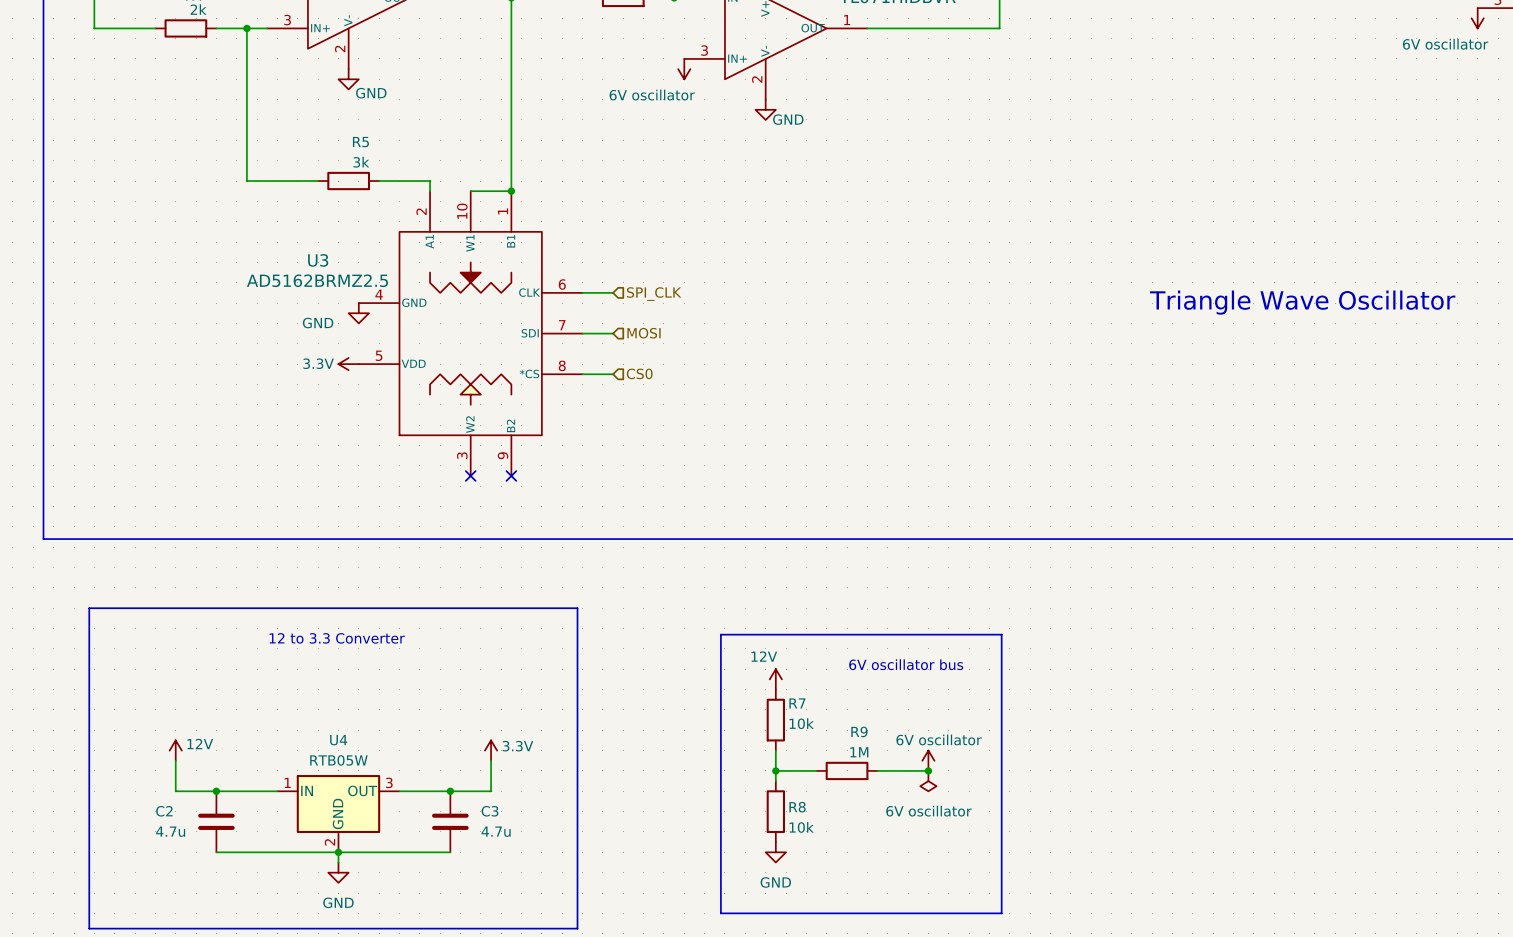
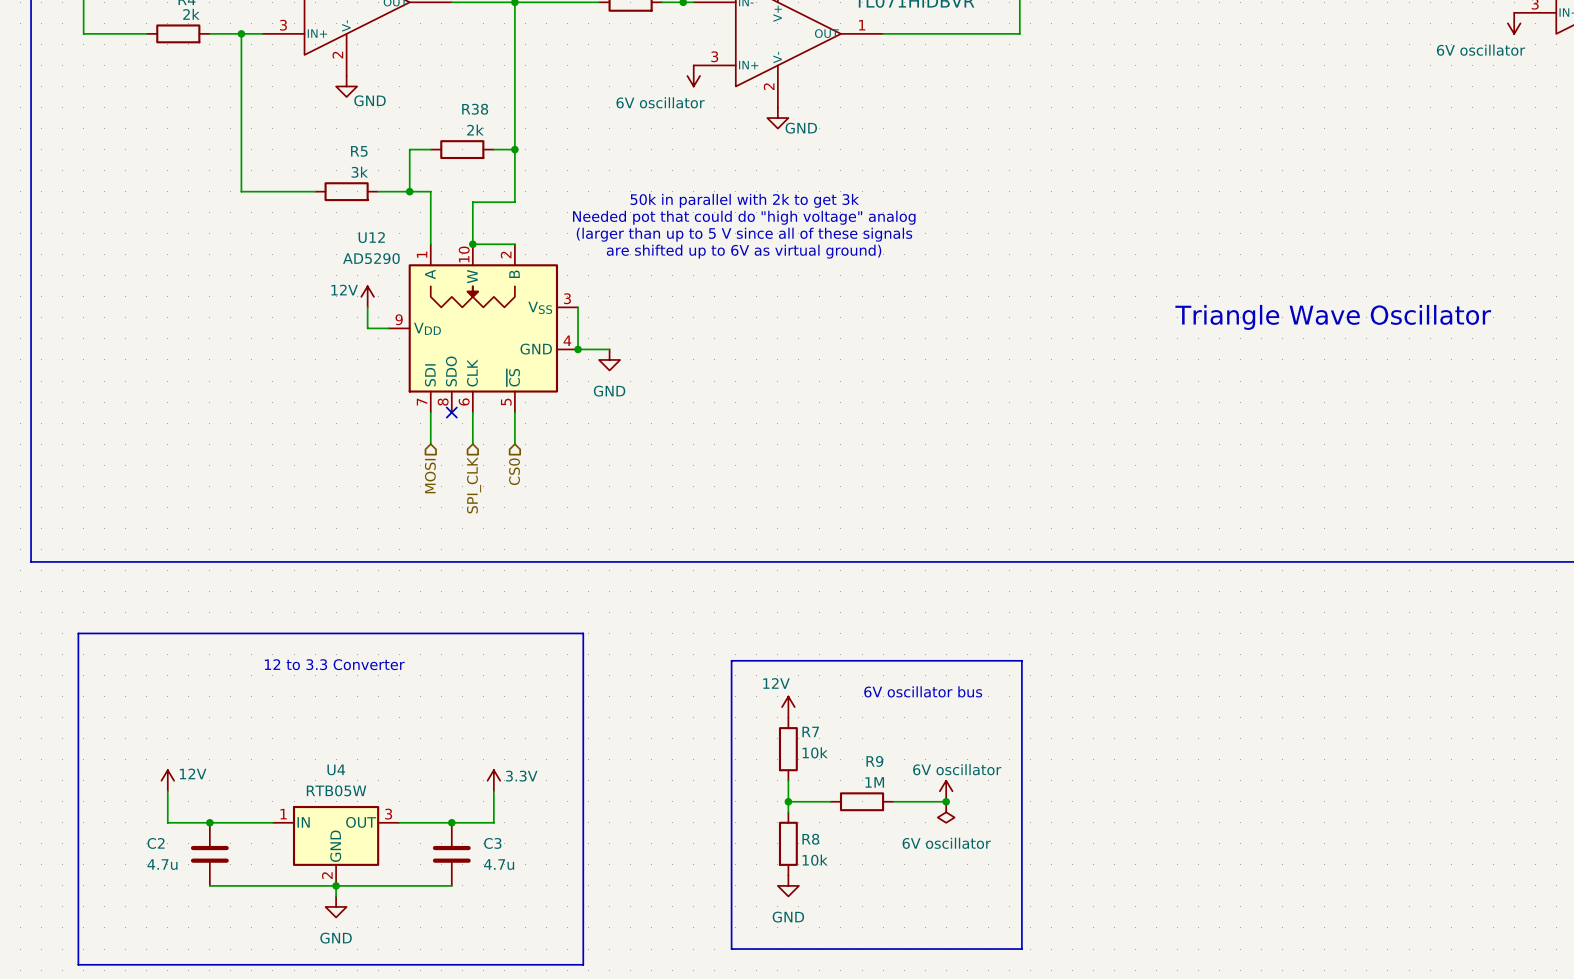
wire: none -> (430, 149) (409, 149) (409, 191)
R38: none -> 2k (462, 149)
wire: none -> (493, 149) (514, 149)
junction: none -> (514, 149)
junction: none -> (409, 191)
text: none -> 50k in parallel with 2k to get 3k (744, 200)
junction: (511, 191) -> none
text: none -> Needed pot that could do "high voltage" analog (744, 217)
text: none -> (larger than up to 5 V since all of these signals (744, 234)
junction: none -> (472, 244)
text: none -> are shifted up to 6V as virtual ground) (744, 251)
power symbol: none -> 12V (367, 296)
wire: none -> (367, 307) (367, 328) (388, 328)
wire: none -> (578, 307) (578, 349) (588, 349)
wire: (582, 292) (613, 292) -> none
hierarchical label: SPI_CLK (654, 294) -> none
power symbol: GND (358, 313) -> none
U12: none -> AD5290 (483, 328)
U3: AD5162BRMZ2.5 (470, 333) -> none
junction: none -> (578, 349)
wire: (602, 333) (613, 333) -> none
hierarchical label: MOSI (644, 333) -> none
power symbol: none -> GND (609, 359)
power symbol: 3.3V (348, 364) -> none
hierarchical label rotation: 0° (639, 373) -> 90° clockwise (514, 471)
hierarchical label position: CS0 (639, 373) -> CS0 (514, 471)
wire: (582, 374) (613, 374) -> none
wire: none -> (430, 412) (430, 444)
no-connect mark: none -> (451, 412)
wire: none -> (472, 412) (472, 444)
wire: none -> (514, 412) (514, 444)
hierarchical label: none -> MOSI (430, 476)
hierarchical label: none -> SPI_CLK (474, 485)
no-connect mark: (470, 475) -> none
no-connect mark: (511, 475) -> none

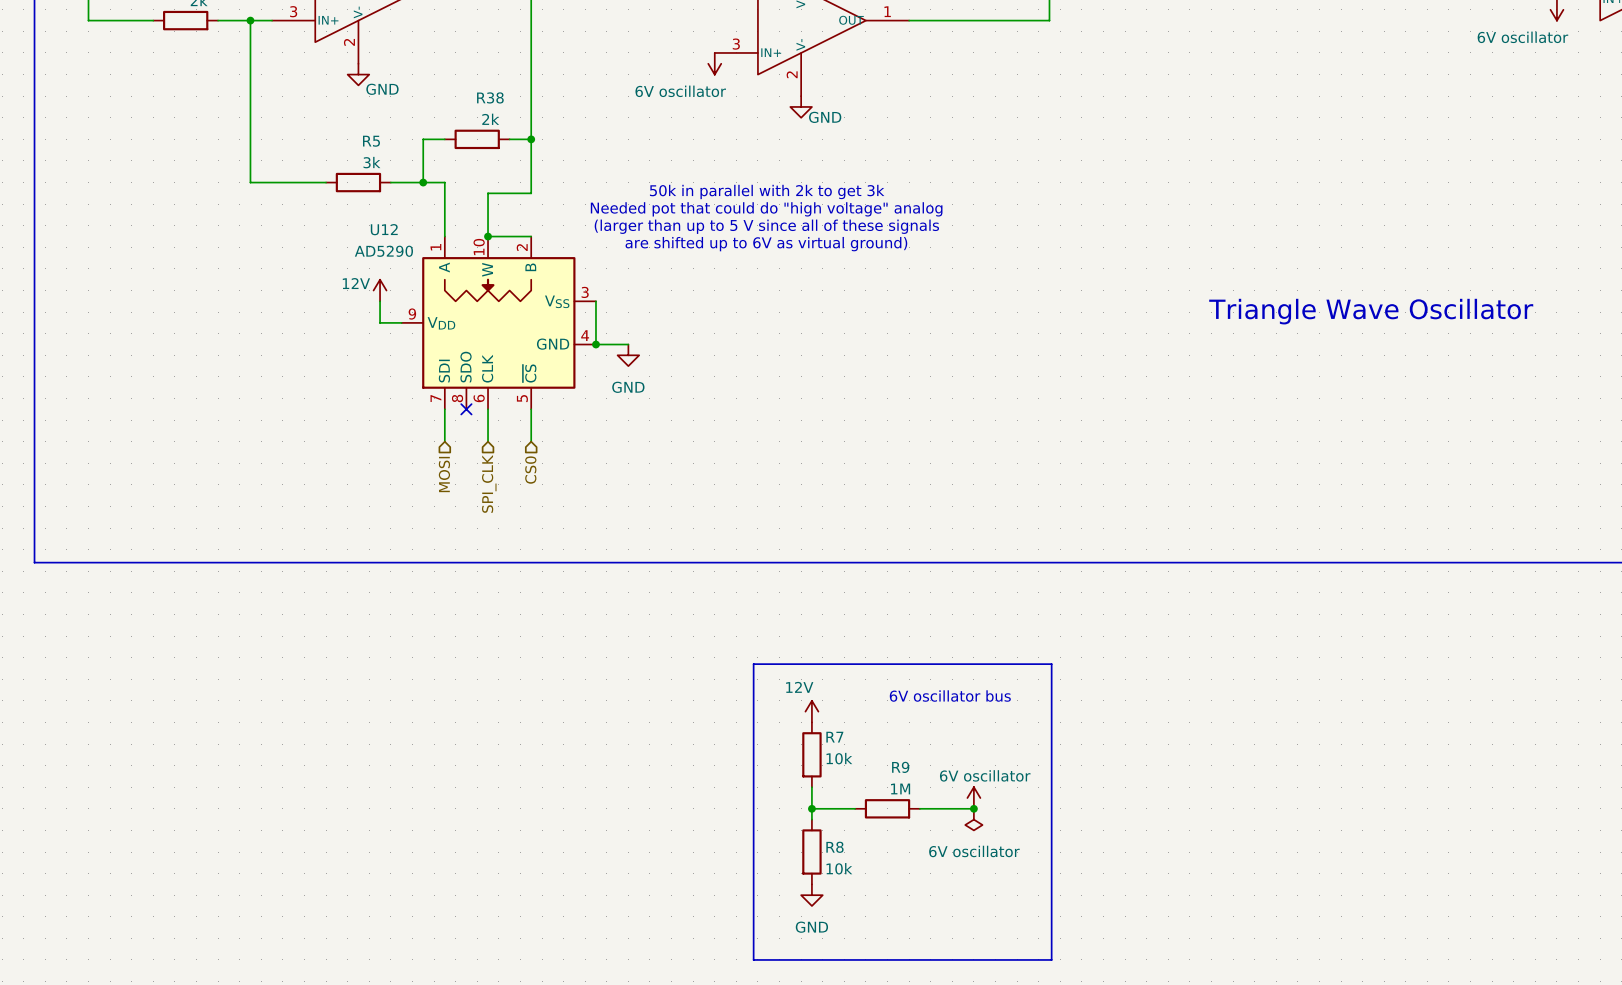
line: (78, 633) (583, 633) (583, 964) (78, 964) (78, 633) -> none
text: 12 to 3.3 Converter (334, 664) -> none
power symbol: 12V (167, 780) -> none
power symbol: 3.3V (493, 780) -> none
wire: (167, 791) (167, 822) (272, 822) -> none
wire: (493, 791) (493, 822) (399, 822) -> none
junction: (209, 822) -> none
junction: (451, 822) -> none
U4: RTB05W (336, 845) -> none
C2: 4.7u (209, 854) -> none
C3: 4.7u (451, 854) -> none
wire: (209, 885) (451, 885) -> none
wire: (336, 885) (336, 896) -> none
junction: (336, 885) -> none
power symbol: GND (336, 906) -> none

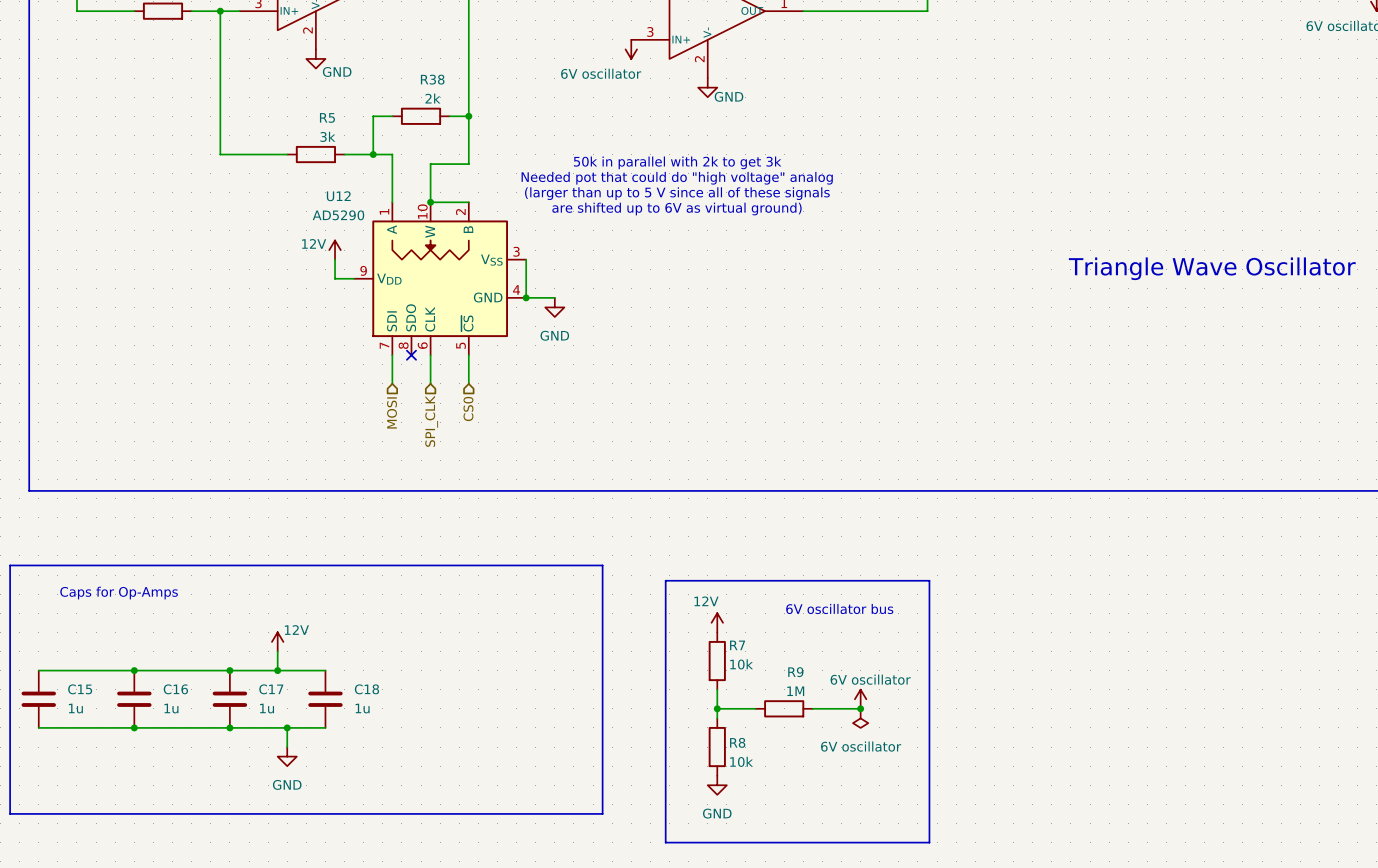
line: none -> (10, 565) (602, 565) (602, 813) (10, 813) (10, 565)
text: none -> Caps for Op-Amps (119, 593)
power symbol: none -> 12V (277, 641)
wire: none -> (277, 651) (277, 670)
wire: none -> (38, 670) (325, 670)
junction: none -> (134, 670)
junction: none -> (229, 670)
junction: none -> (277, 670)
C15: none -> 1u (38, 699)
C16: none -> 1u (134, 699)
C17: none -> 1u (229, 699)
C18: none -> 1u (325, 699)
wire: none -> (38, 727) (325, 727)
junction: none -> (134, 727)
junction: none -> (229, 727)
wire: none -> (287, 727) (287, 747)
junction: none -> (287, 727)
power symbol: none -> GND (287, 756)

